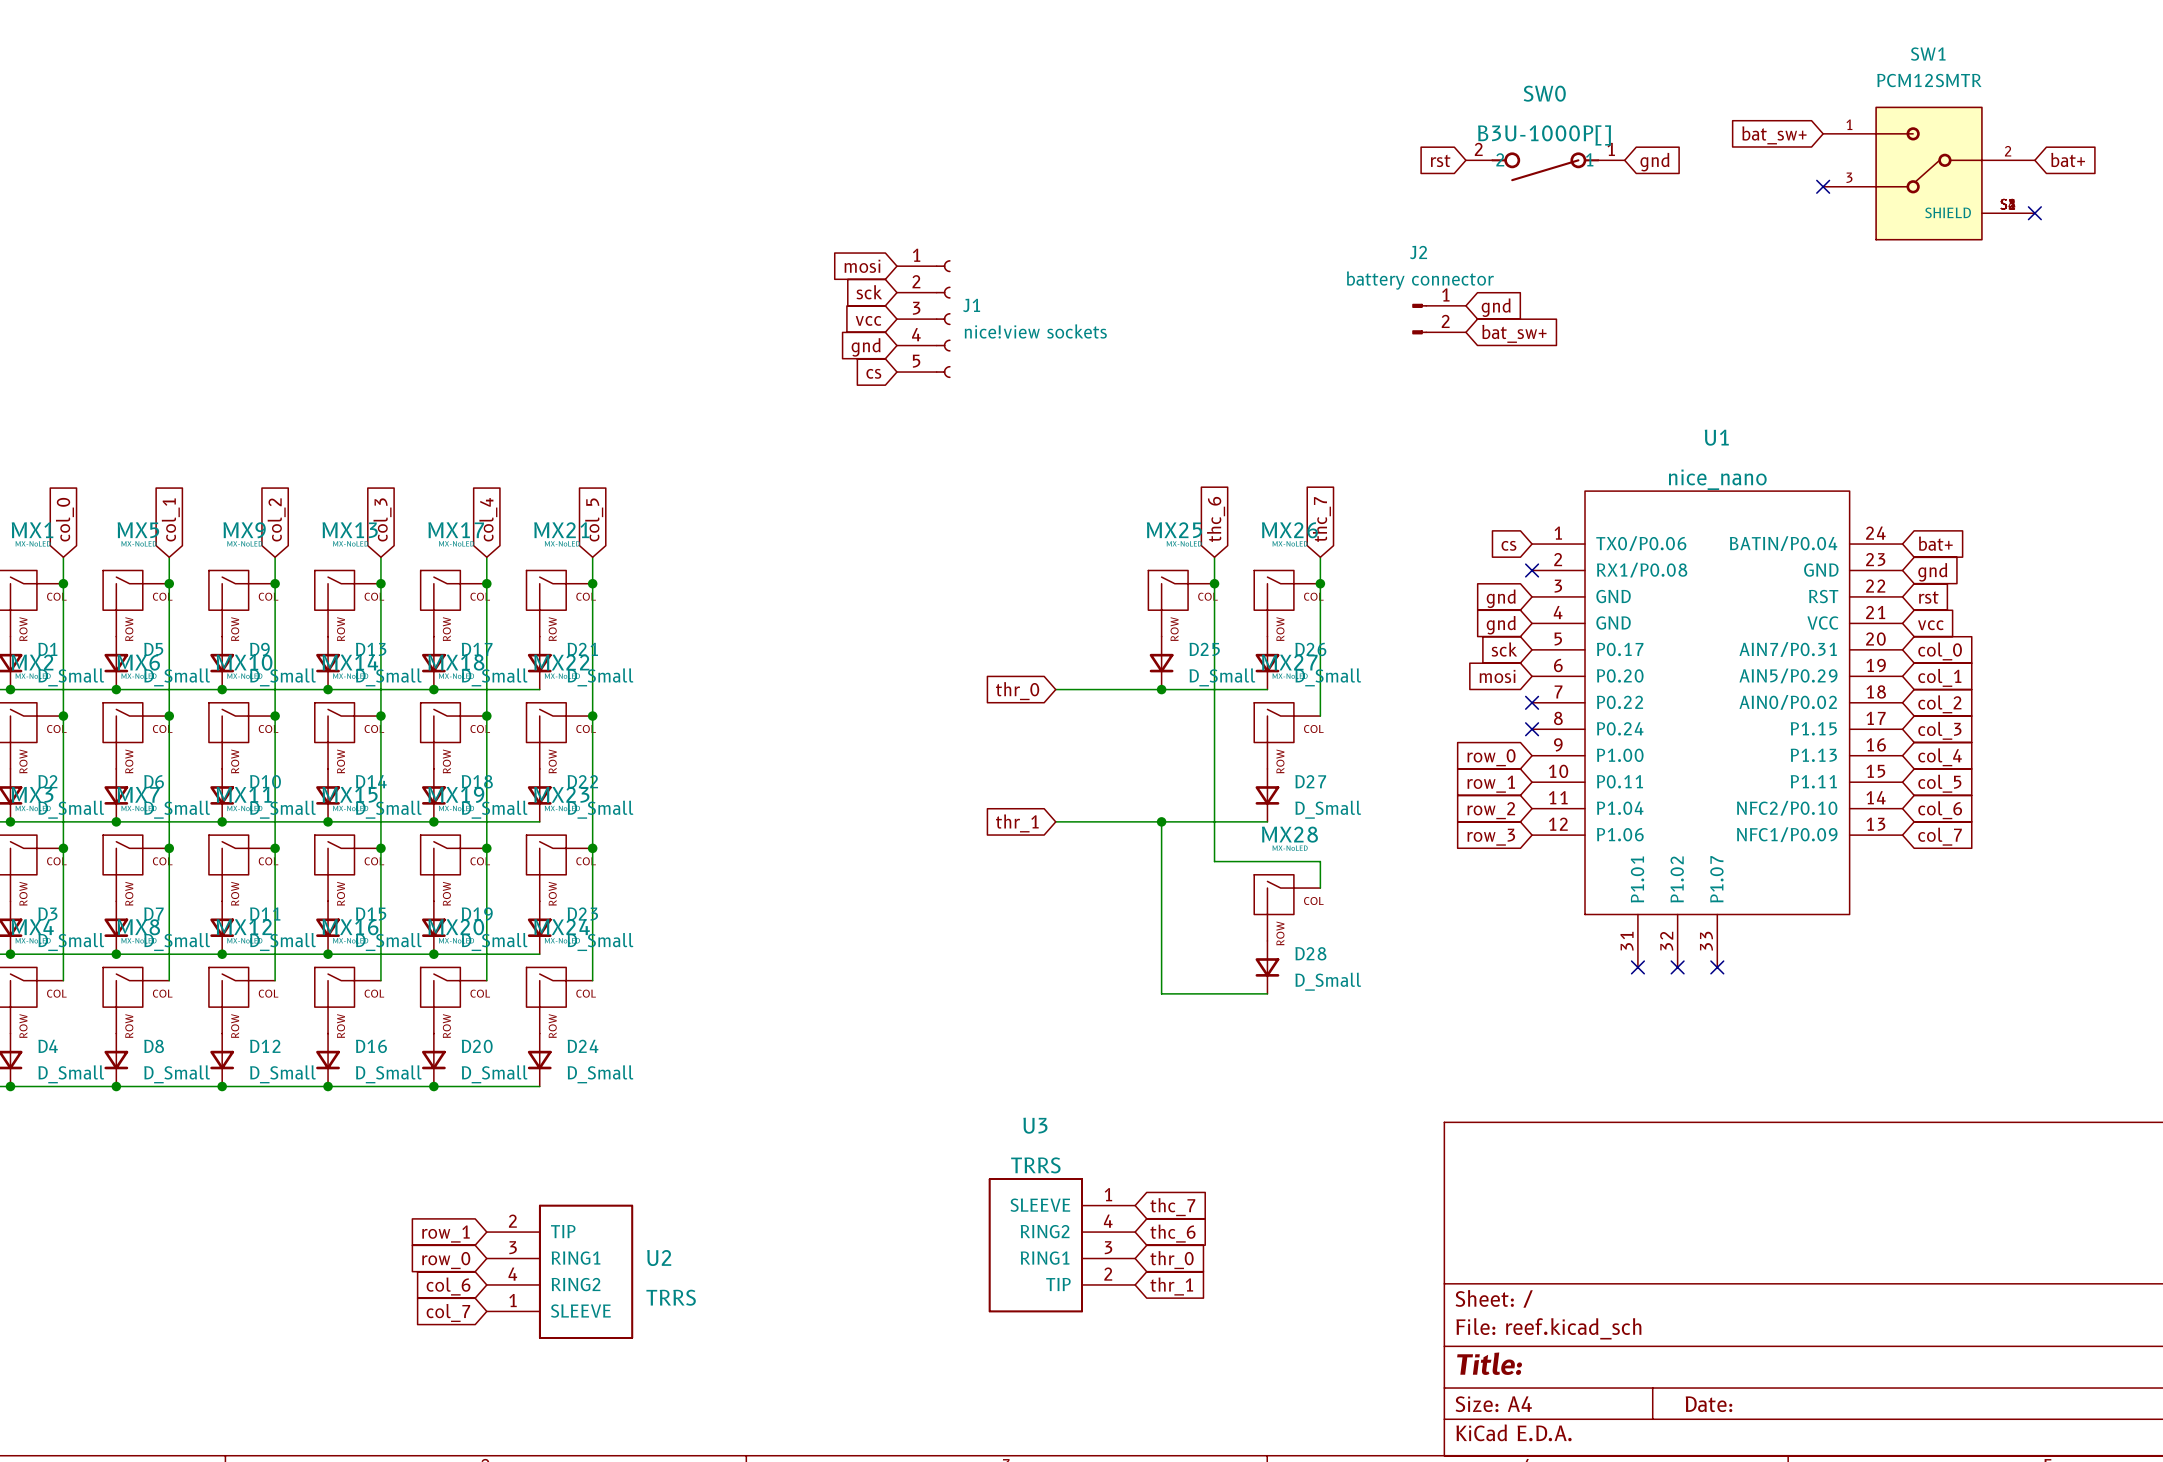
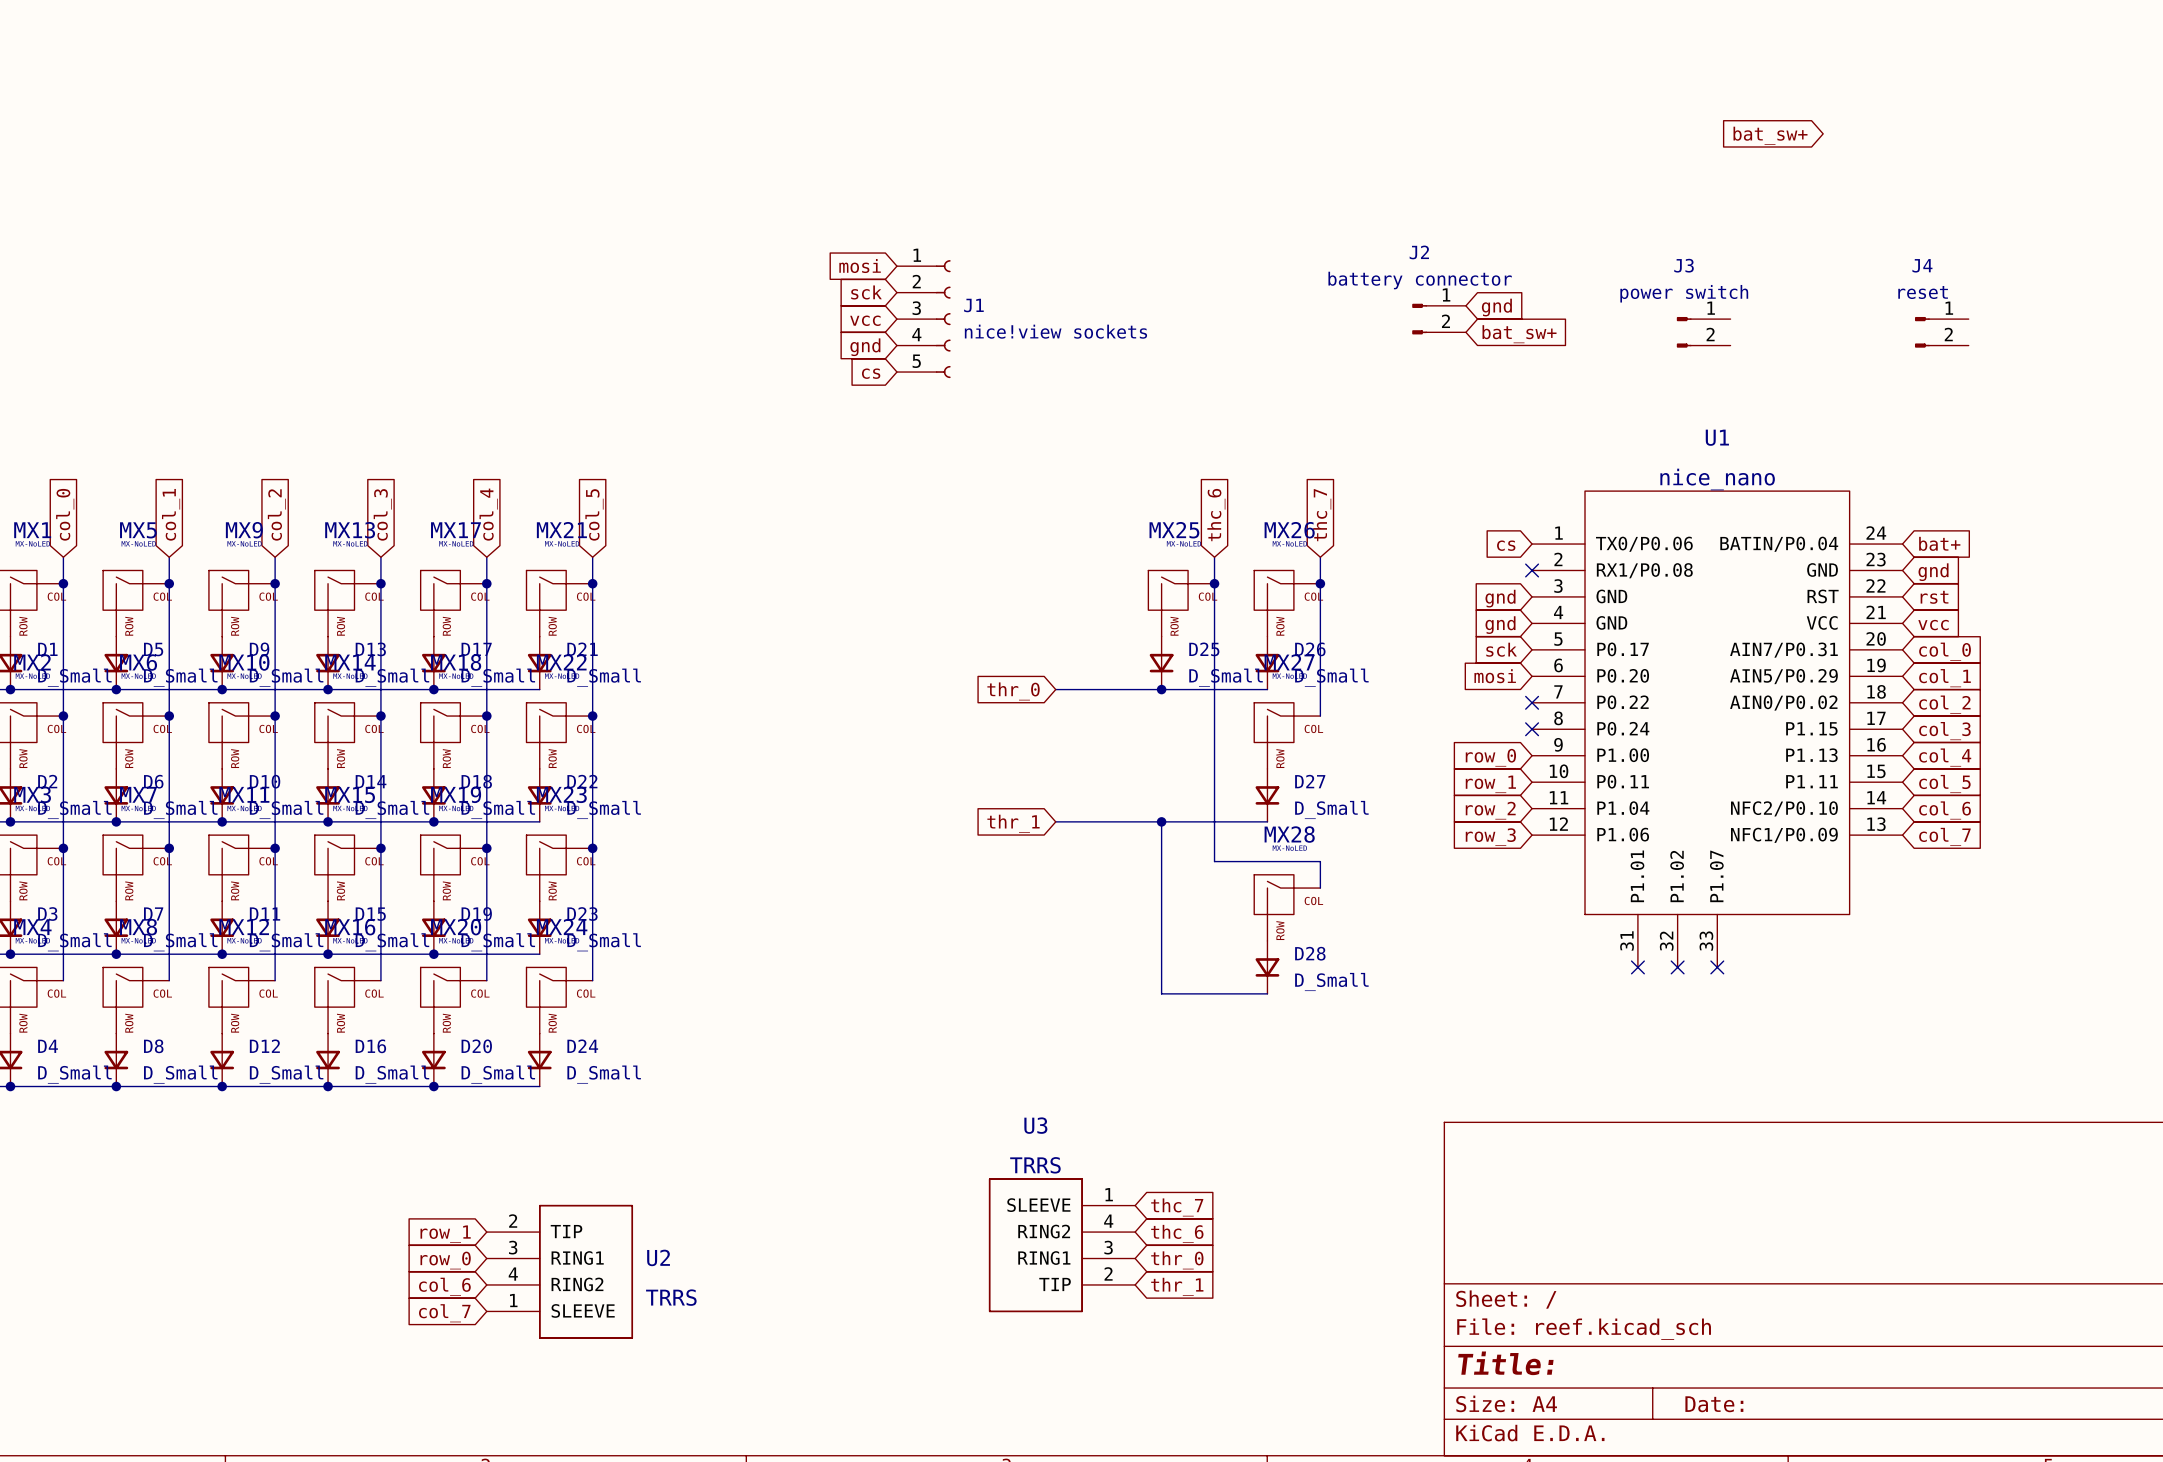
global label: bat+ (2068, 159) -> none
global label: rst (1440, 160) -> none
global label: gnd (1654, 162) -> none
SW0: B3U-1000P[] (1545, 166) -> none
SW1: PCM12SMTR (1929, 173) -> none
no-connect mark: (1823, 186) -> none
no-connect mark: (2034, 213) -> none
J3: none -> power switch (1703, 332)
J4: none -> reset (1941, 332)

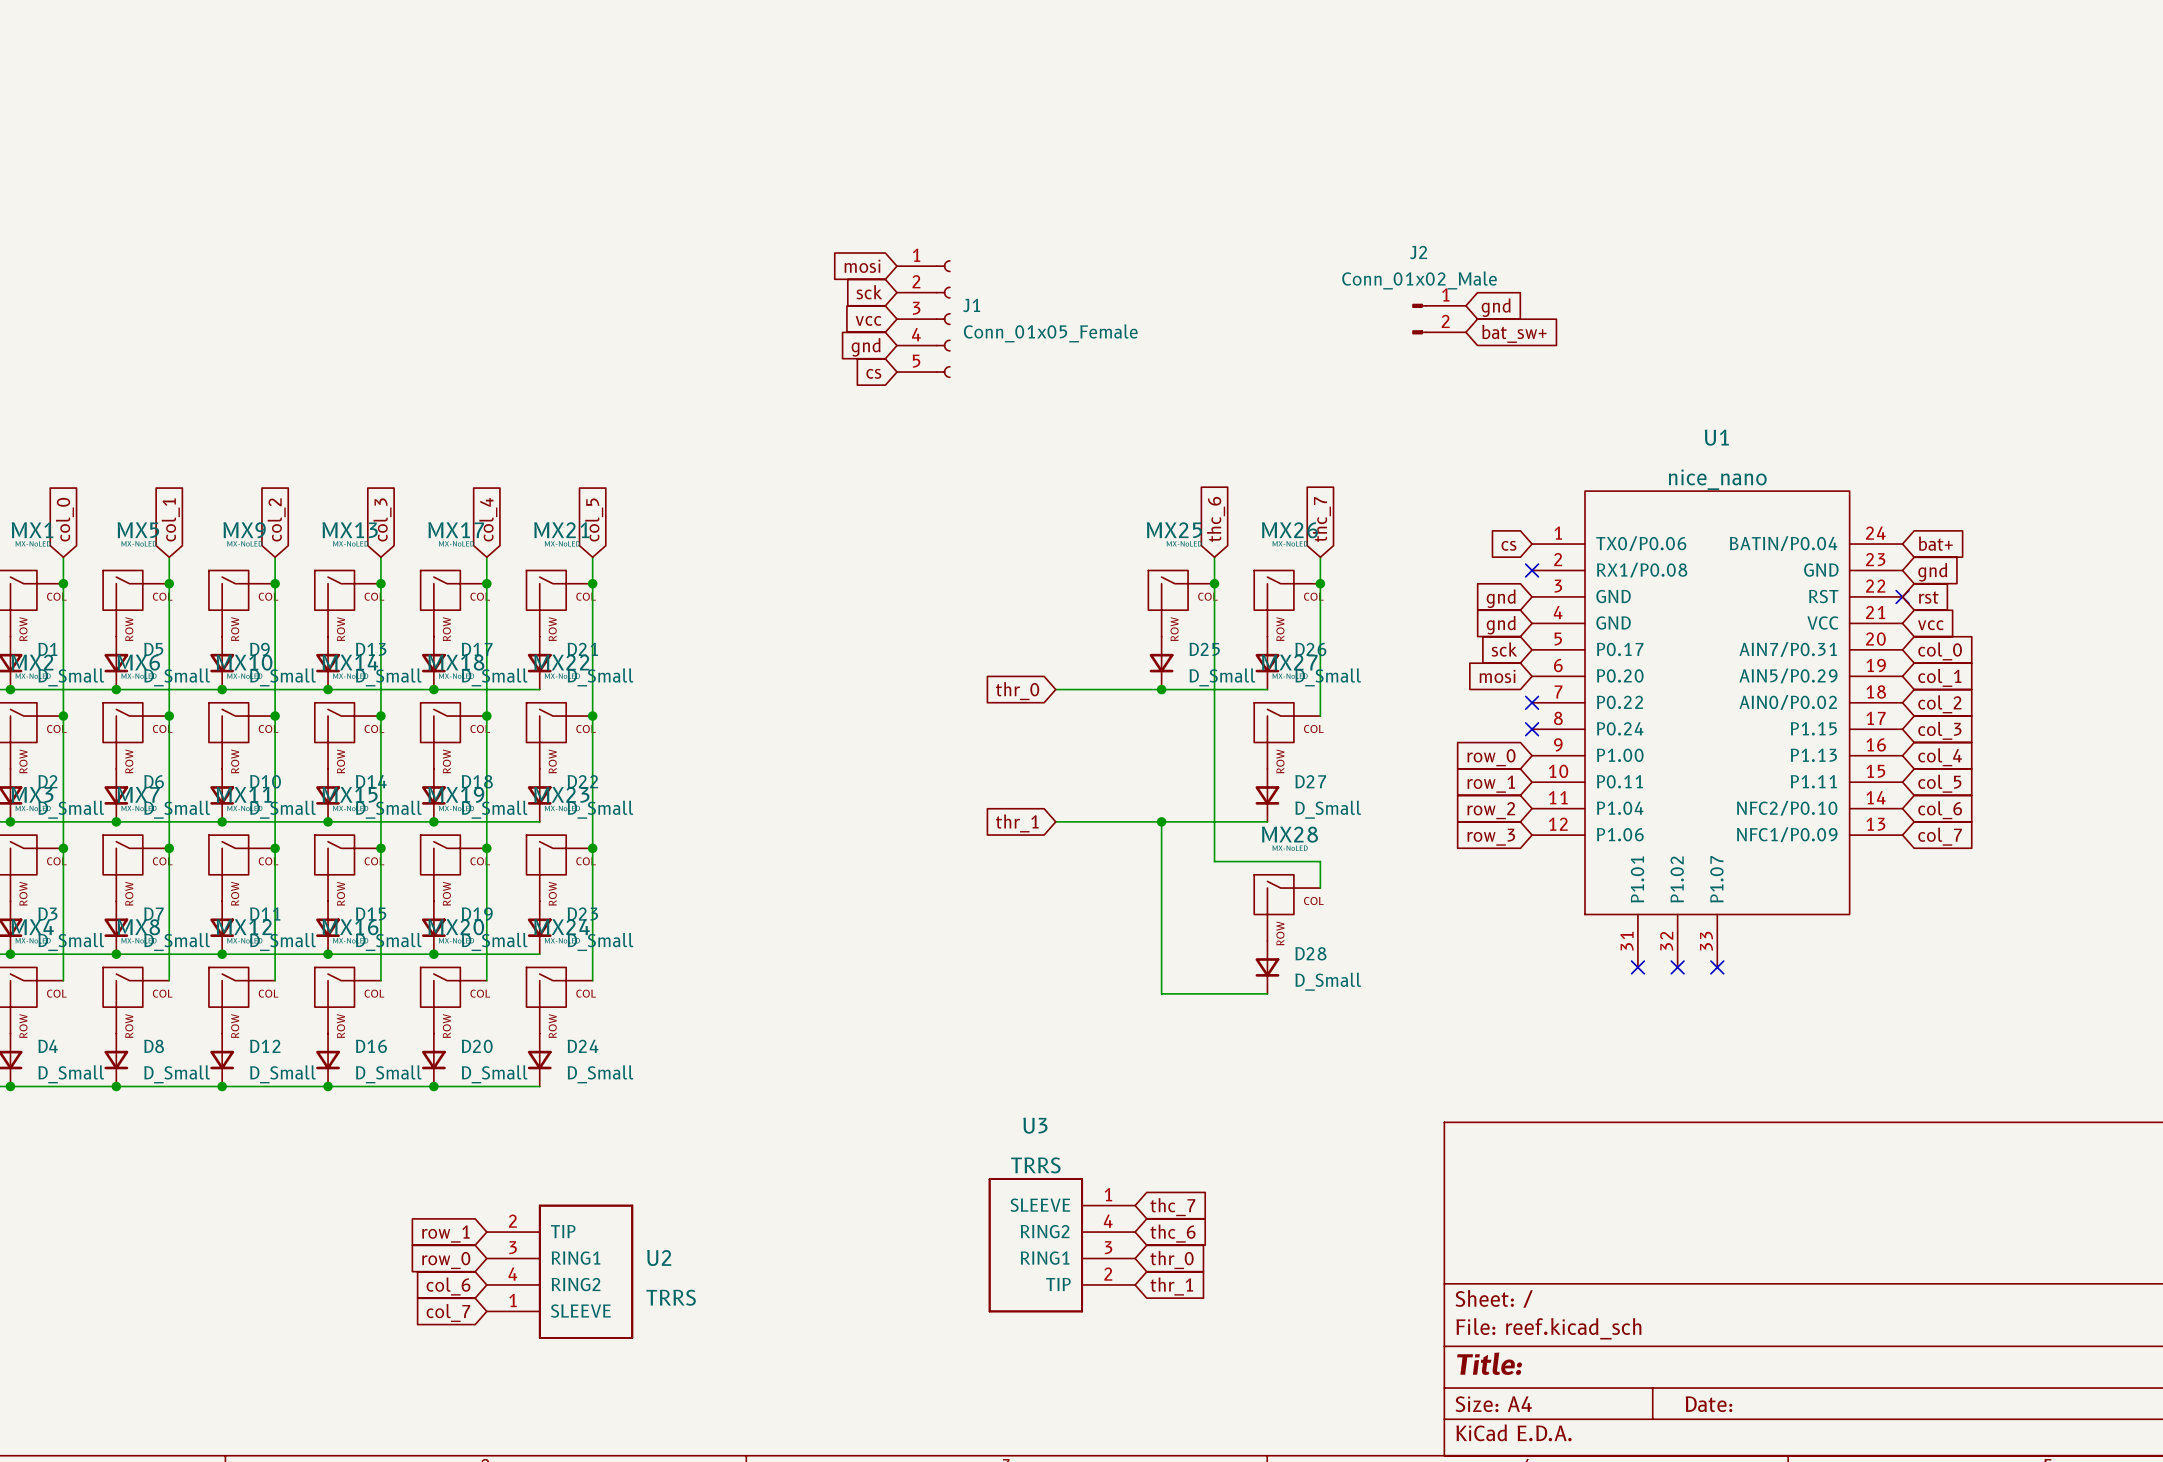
global label: bat_sw+ (1770, 135) -> none
J2 value: battery connector (1420, 280) -> Conn_01x02_Male (1419, 280)
J1 value: nice!view sockets (1055, 331) -> Conn_01x05_Female (1050, 333)
J3: power switch (1703, 332) -> none
J4: reset (1941, 332) -> none
no-connect mark: none -> (1902, 596)

